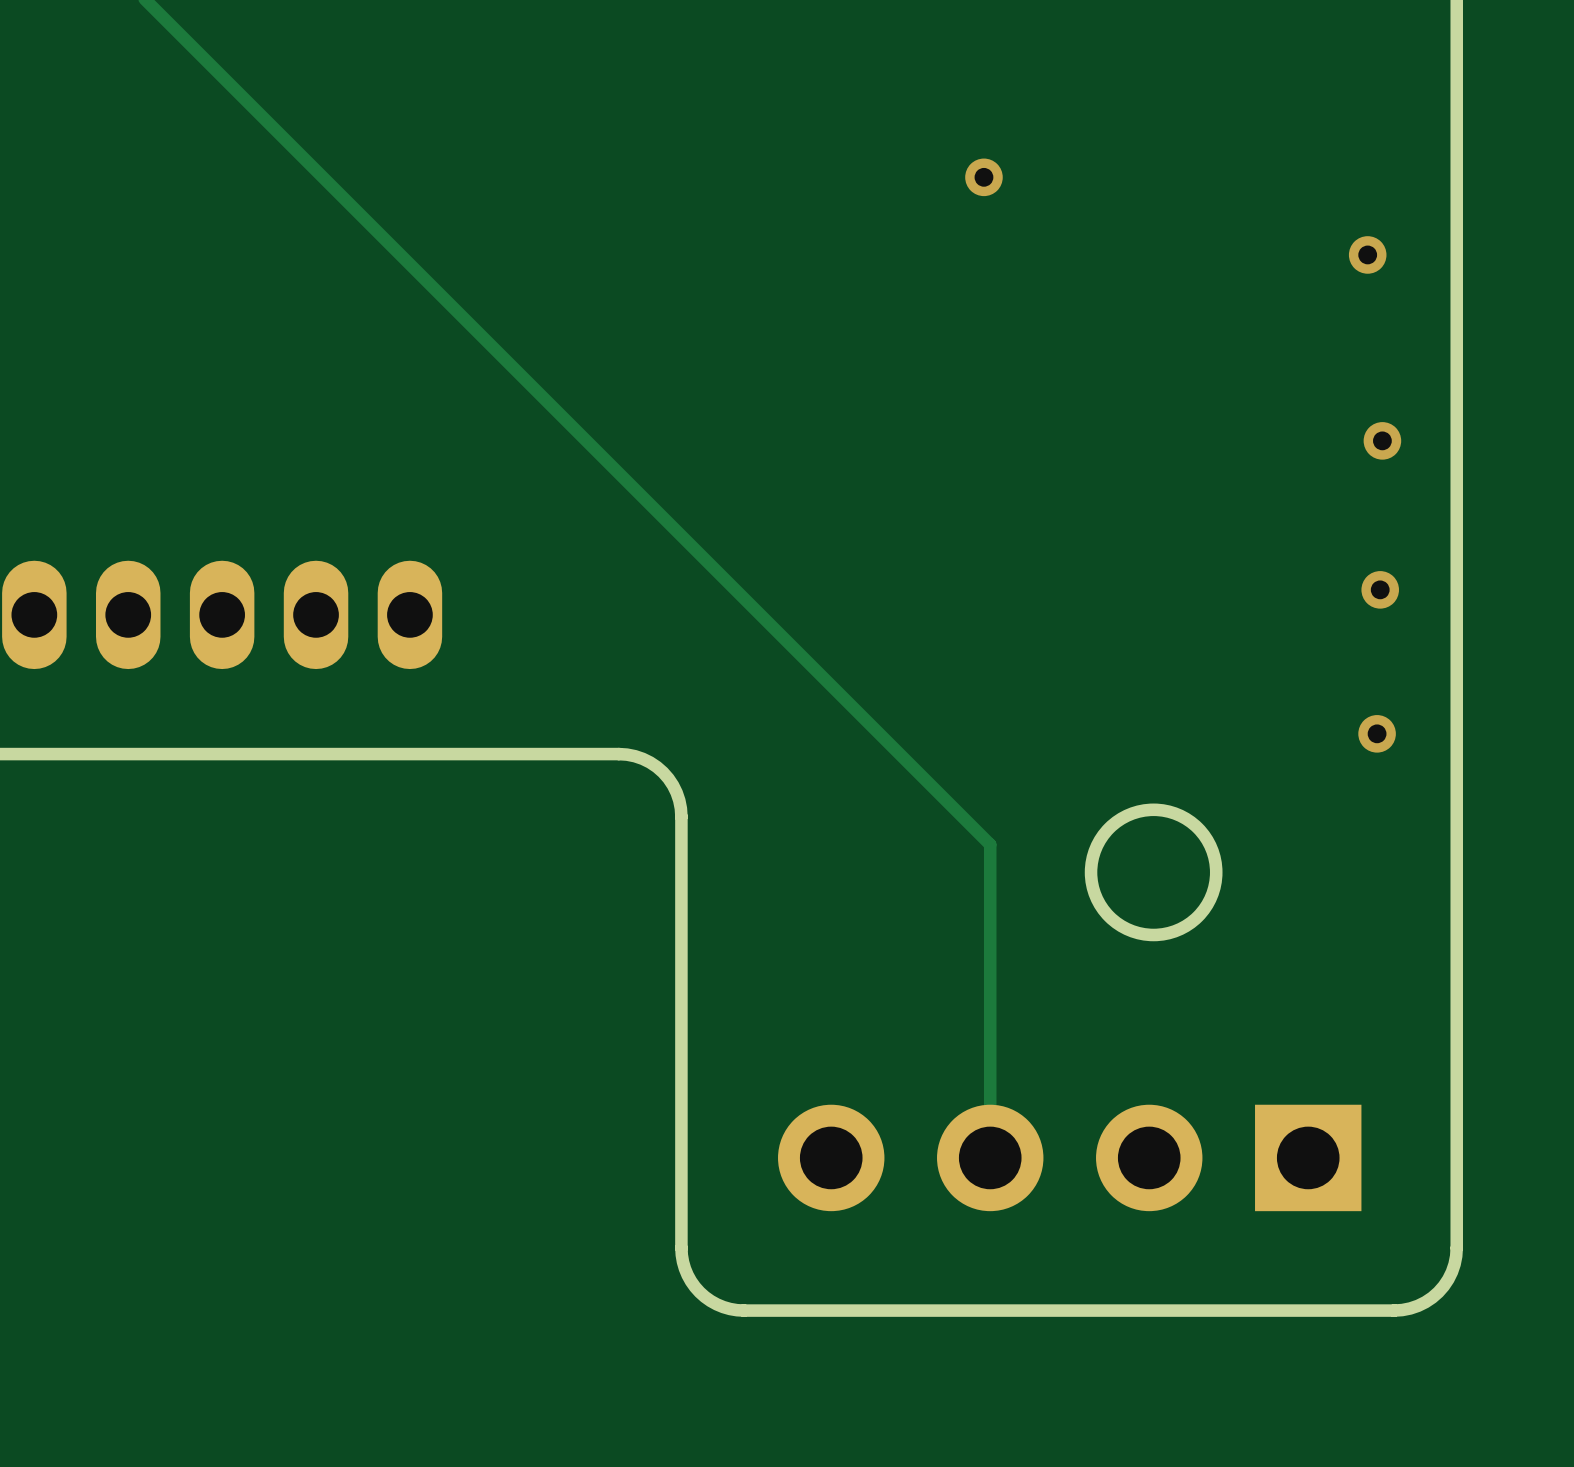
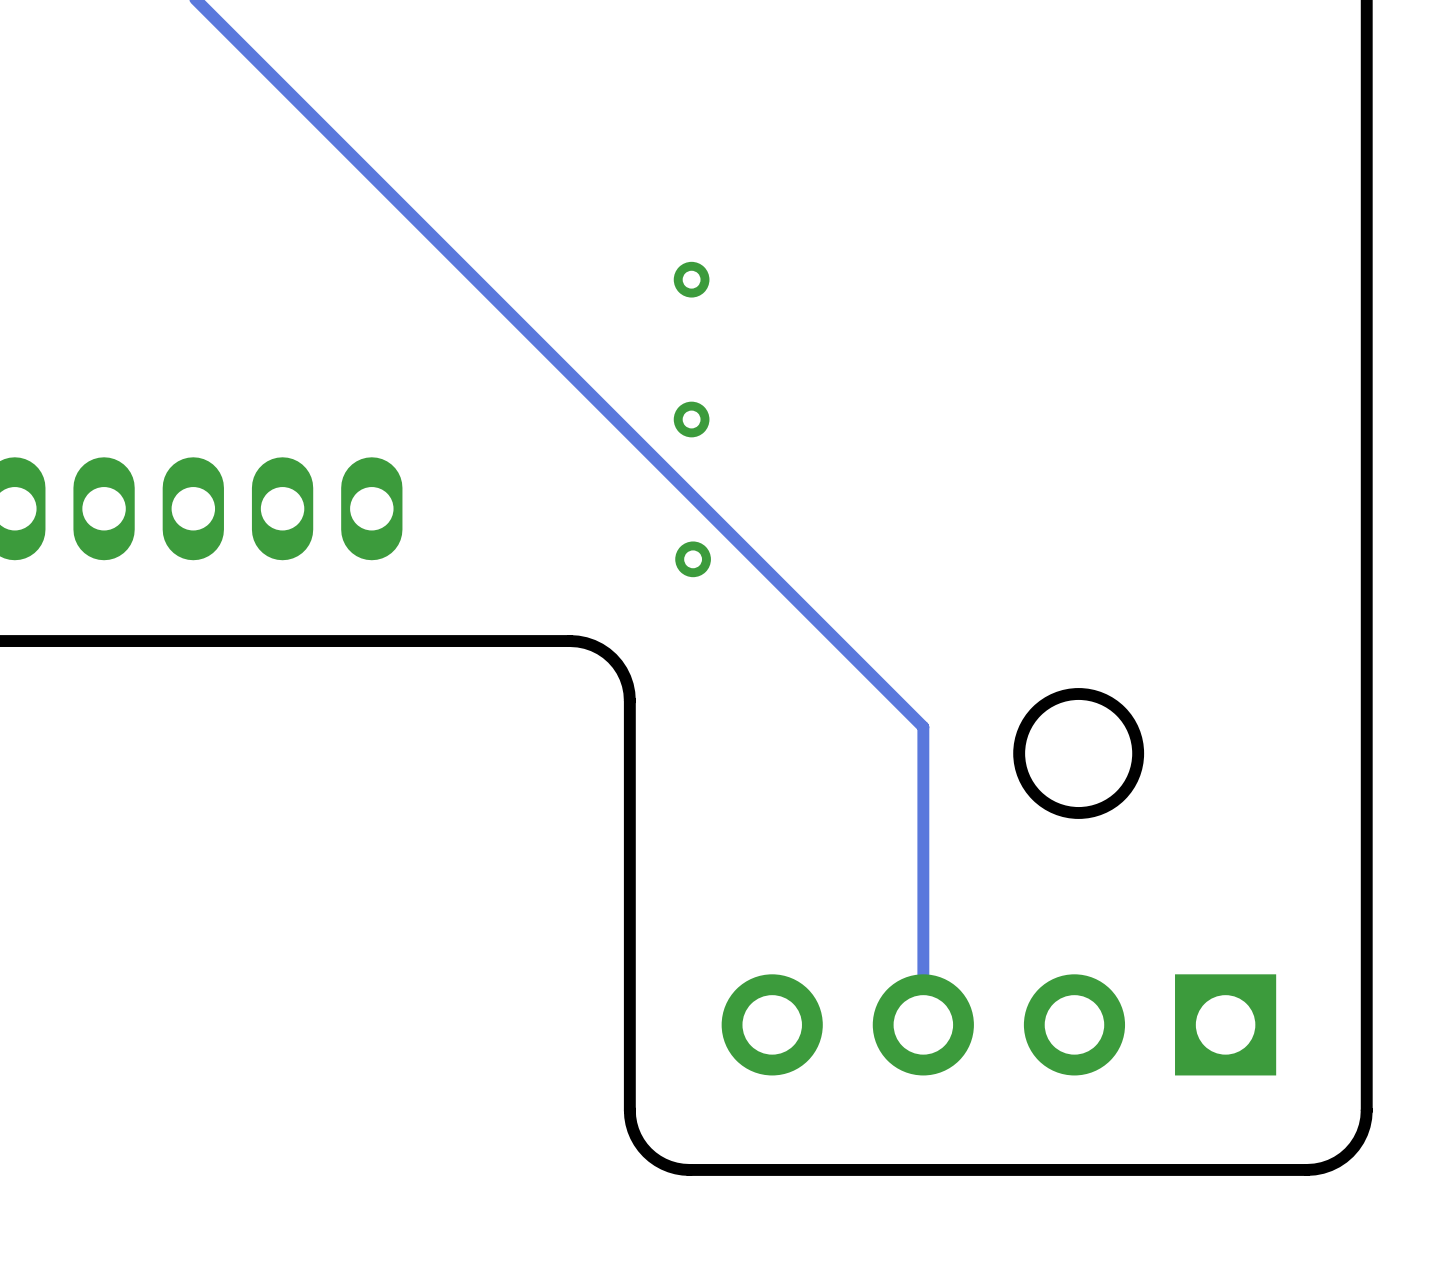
via: (983, 177) -> none
via: (1367, 254) -> none
via: none -> (691, 279)
via: (1382, 440) -> none
via: none -> (691, 419)
via: (1380, 589) -> none
via: none -> (693, 559)
via: (1377, 733) -> none

